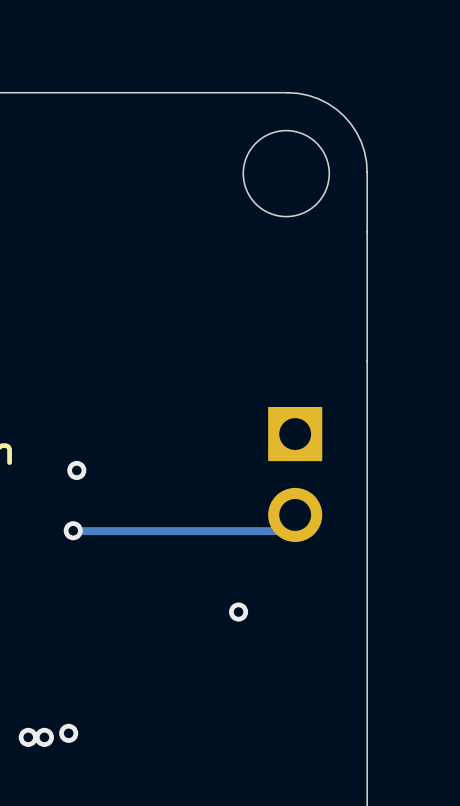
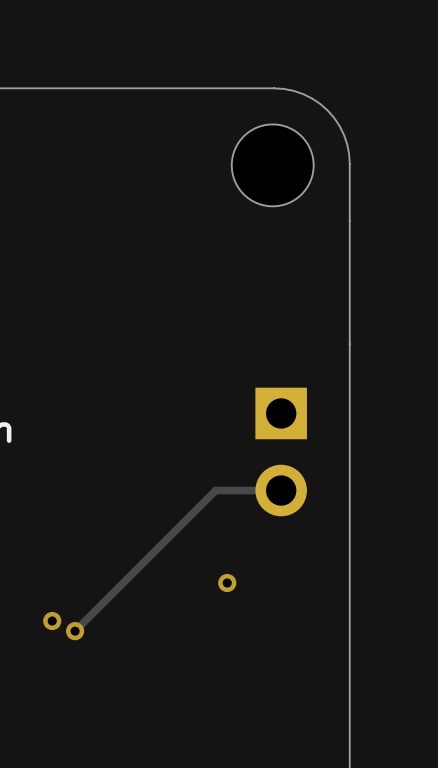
via: (76, 470) -> none
track: (295, 514) (279, 531) (73, 531) -> (281, 490) (215, 490) (75, 631)
via: (73, 530) -> none
via: none -> (52, 621)
via: none -> (75, 631)
via: (68, 733) -> none
via: (28, 737) -> none
via: (44, 737) -> none

